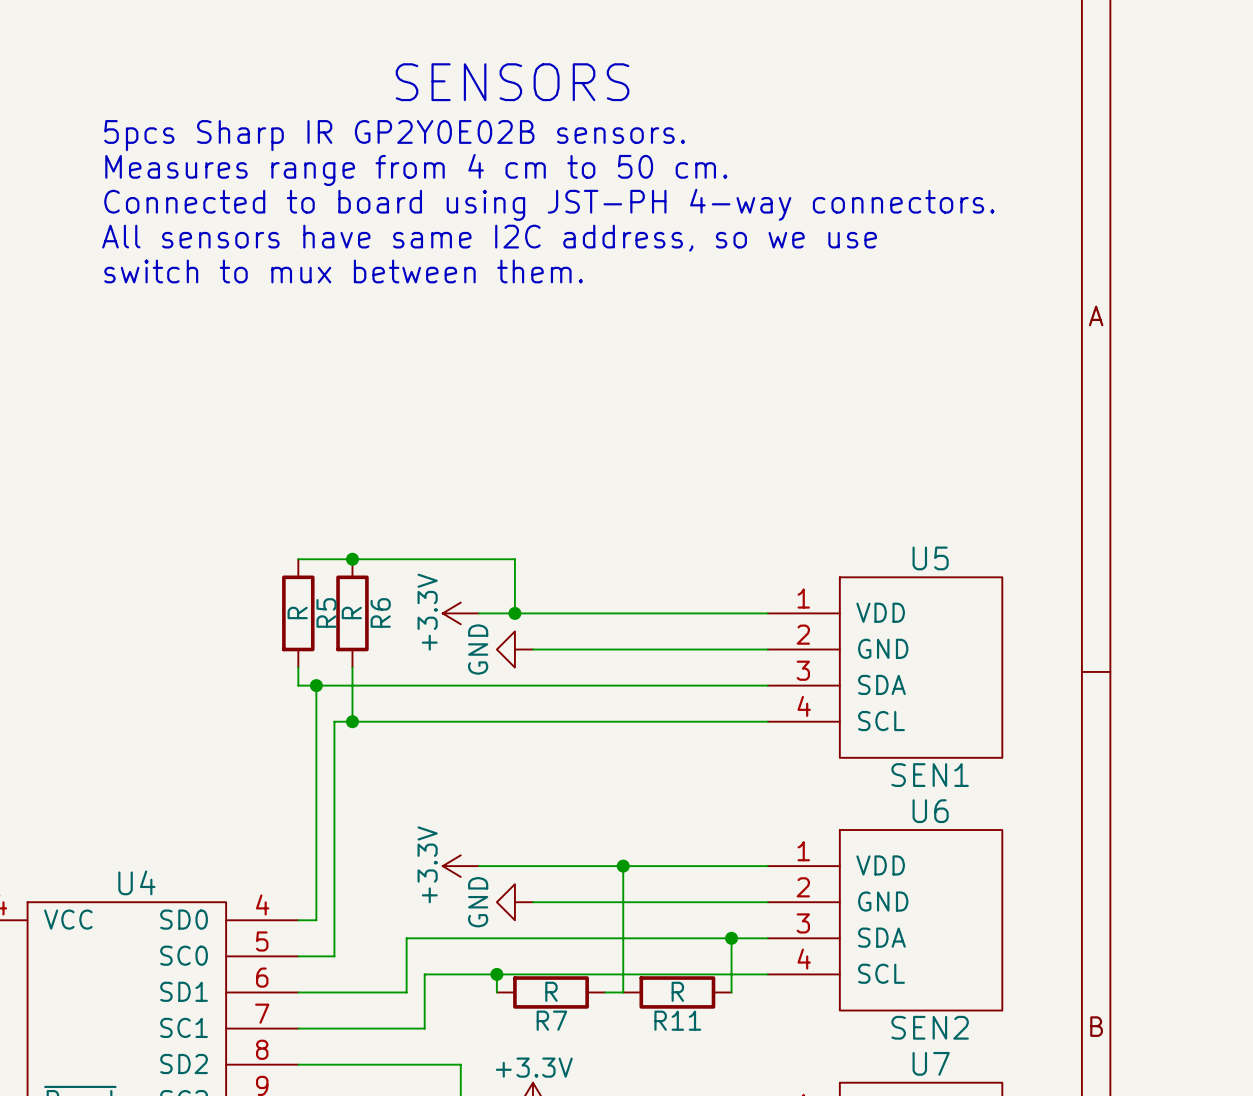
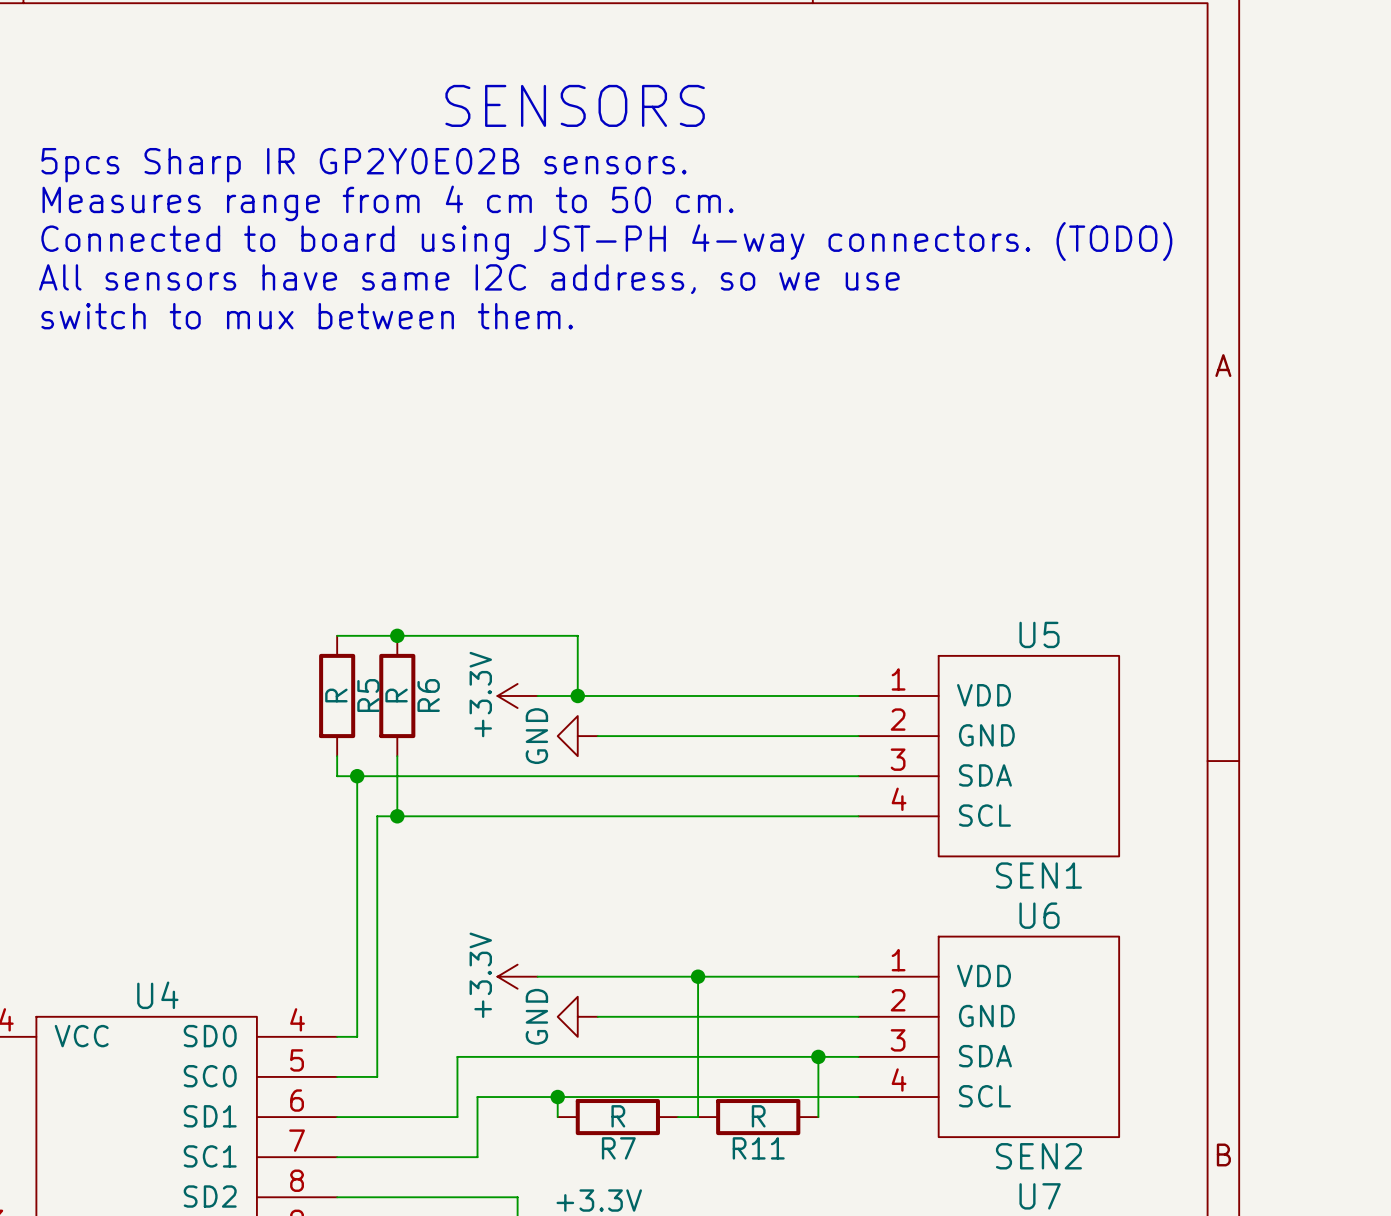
text position: 5pcs Sharp IR GP2Y0E02B sensors. (394, 135) -> 5pcs Sharp IR GP2Y0E02B sensors. (363, 165)
text position: Measures range from 4 cm to 50 cm. (416, 169) -> Measures range from 4 cm to 50 cm. (388, 203)
text: Connected to board using JST-PH 4-way connectors. (549, 204) -> Connected to board using JST-PH 4-way connectors. (TODO) (606, 241)
text position: All sensors have same I2C address, so we use (489, 238) -> All sensors have same I2C address, so we use (469, 279)
text position: switch to mux between them. (343, 271) -> switch to mux between them. (307, 316)

